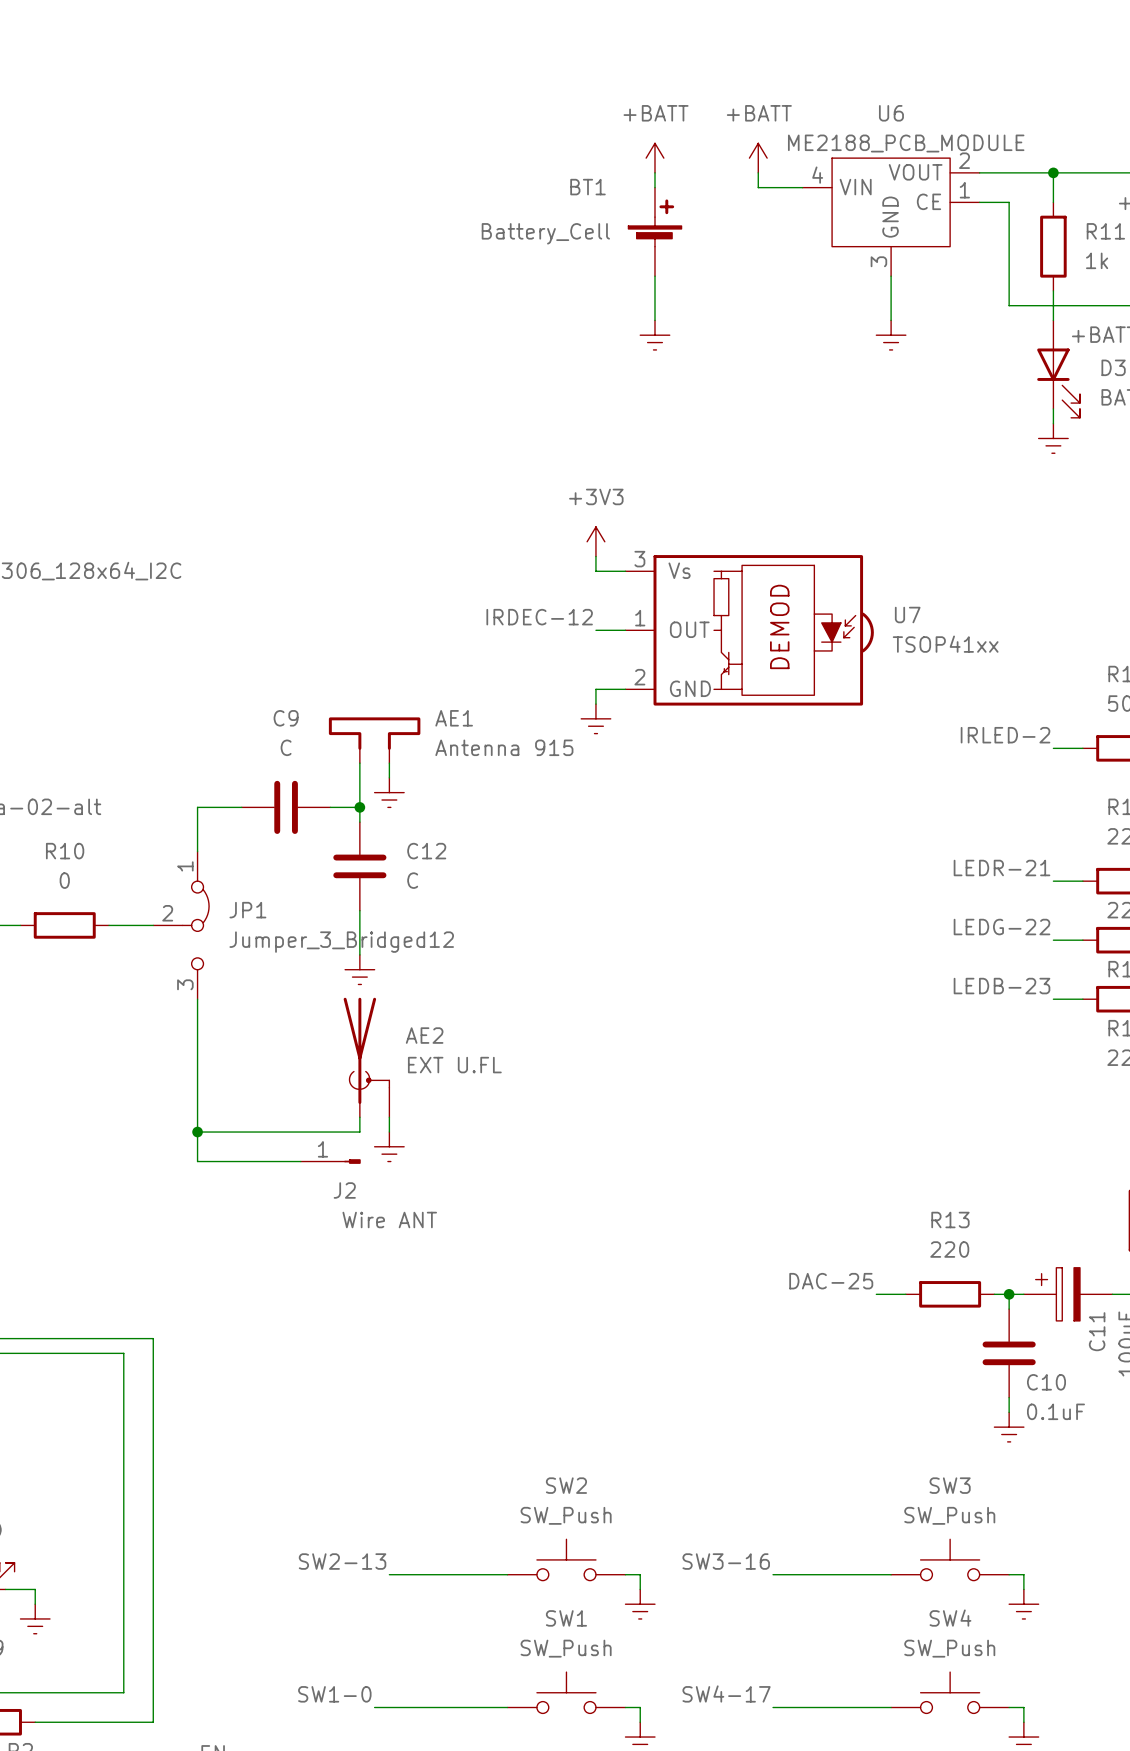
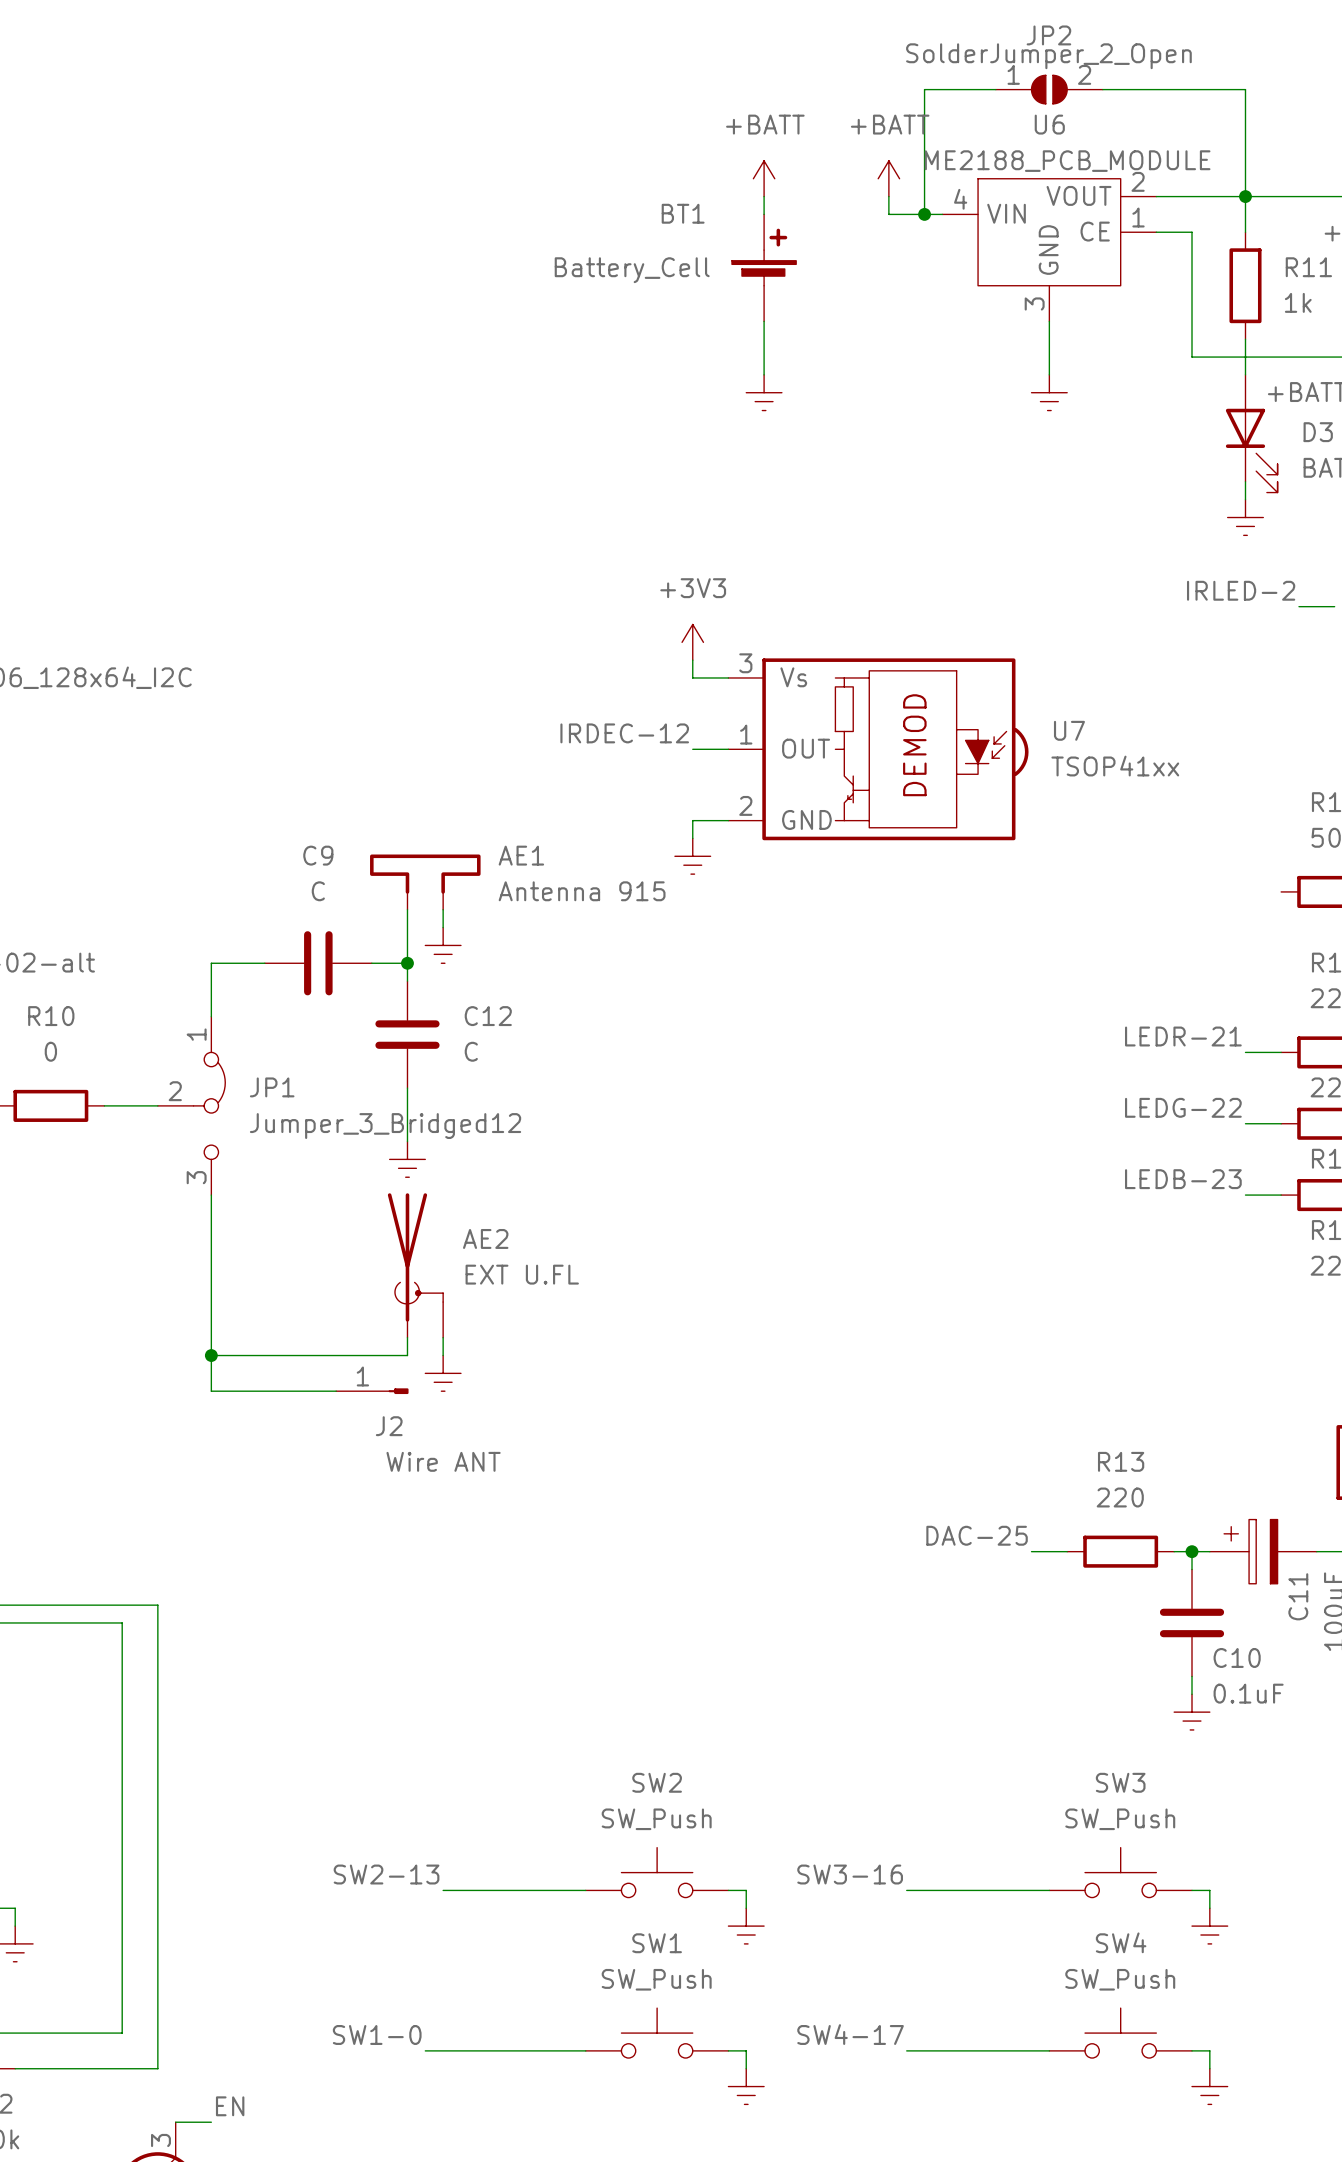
wire: none -> (995, 89) (924, 89) (924, 214)
JP2: none -> SolderJumper_2_Open (1049, 89)
wire: none -> (1102, 89) (1245, 89) (1245, 196)
junction: none -> (924, 214)
label position: IRLED-2 (1005, 735) -> IRLED-2 (1241, 590)
wire: (1053, 748) (1082, 748) -> (1298, 606) (1334, 606)

